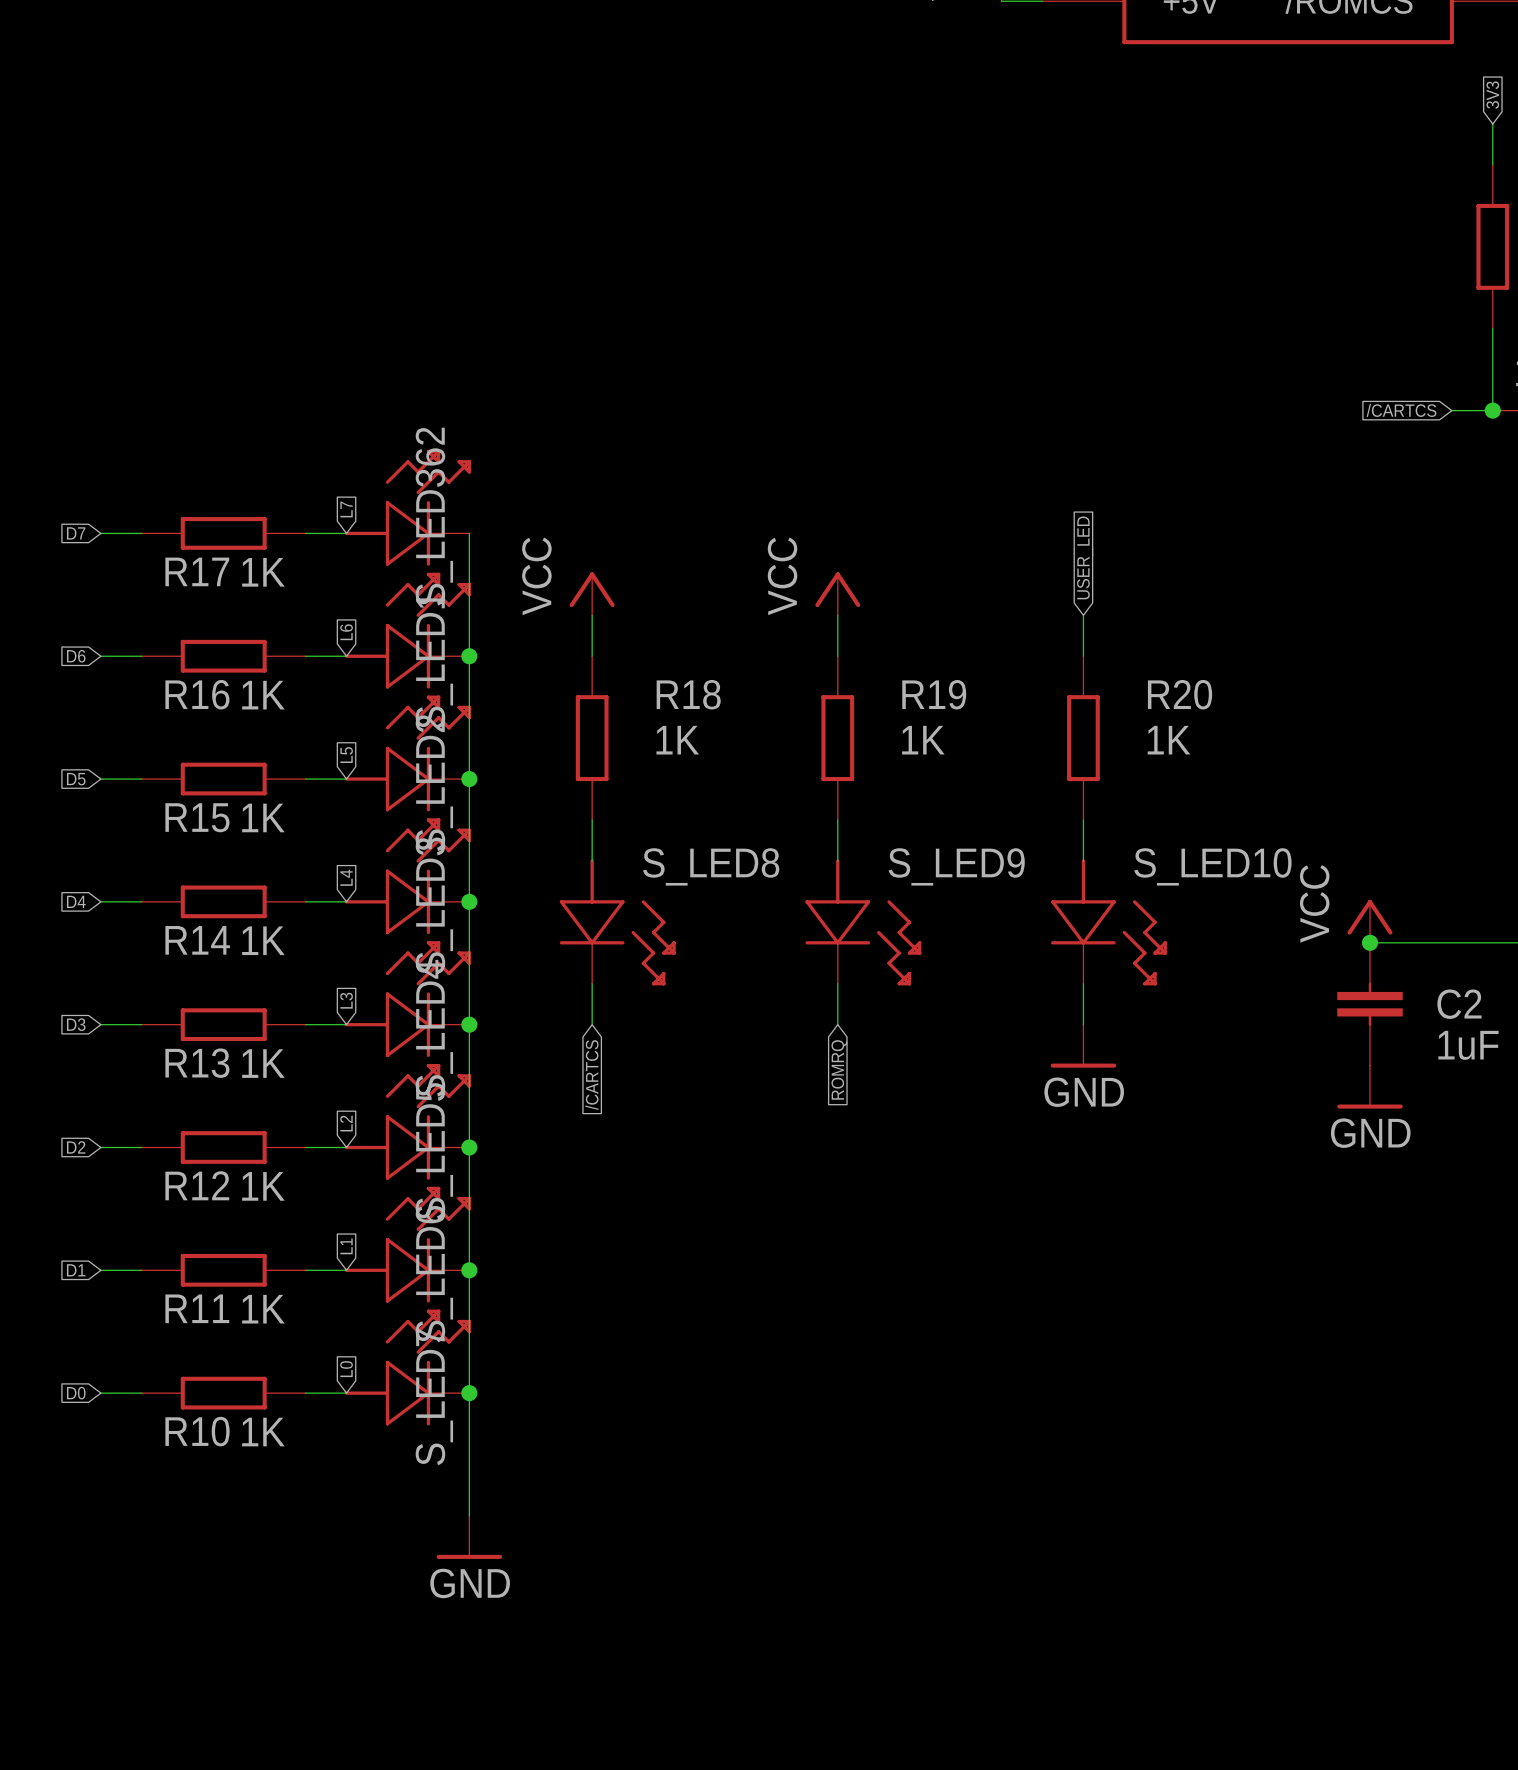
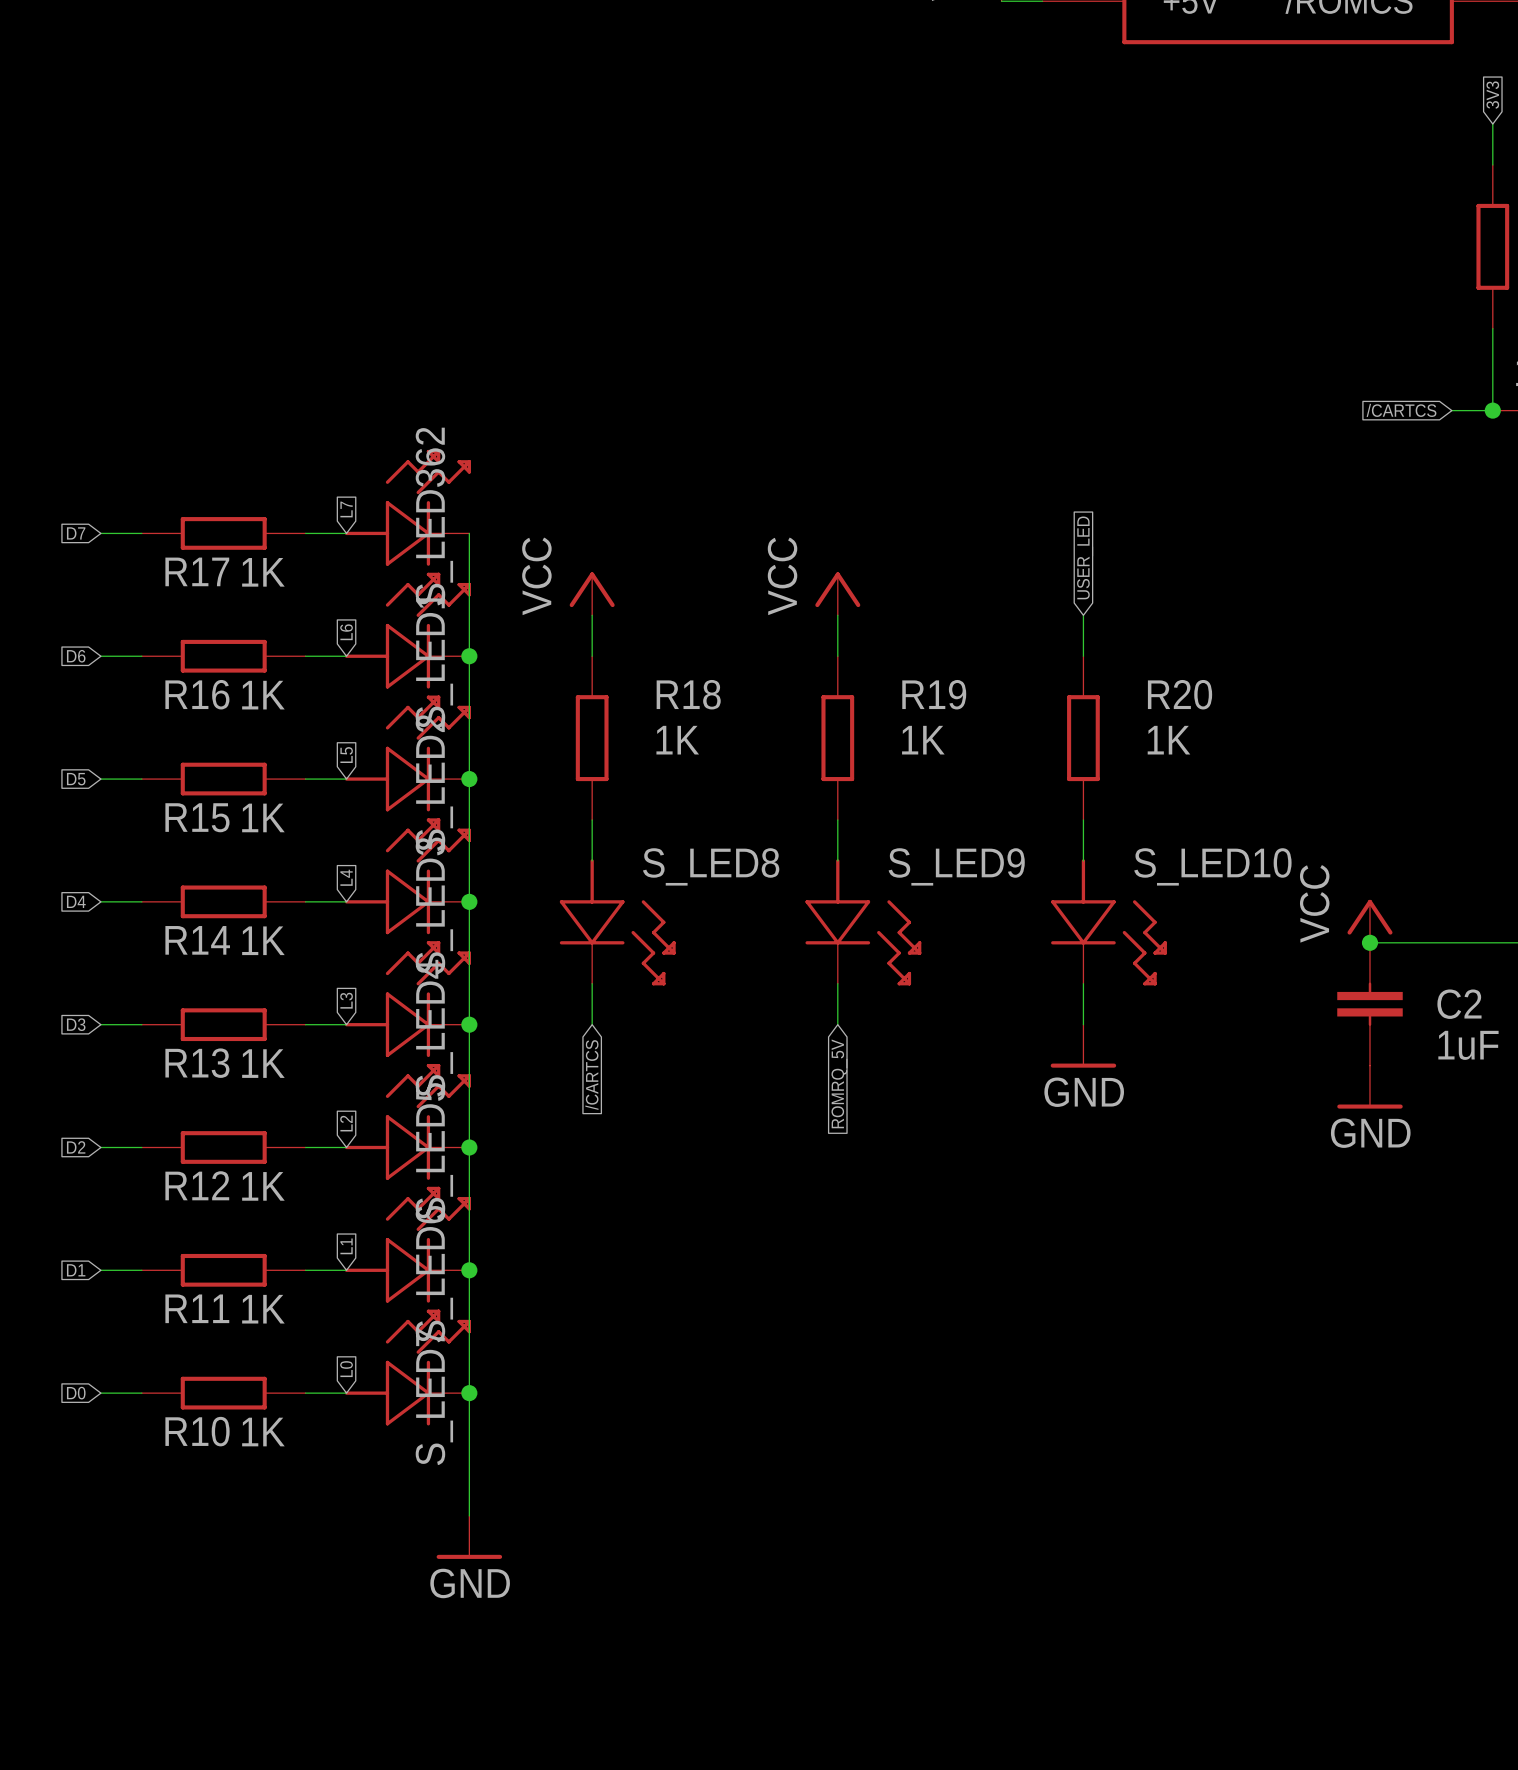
global label: ROMRQ (839, 1069) -> ROMRQ_5V (839, 1083)

